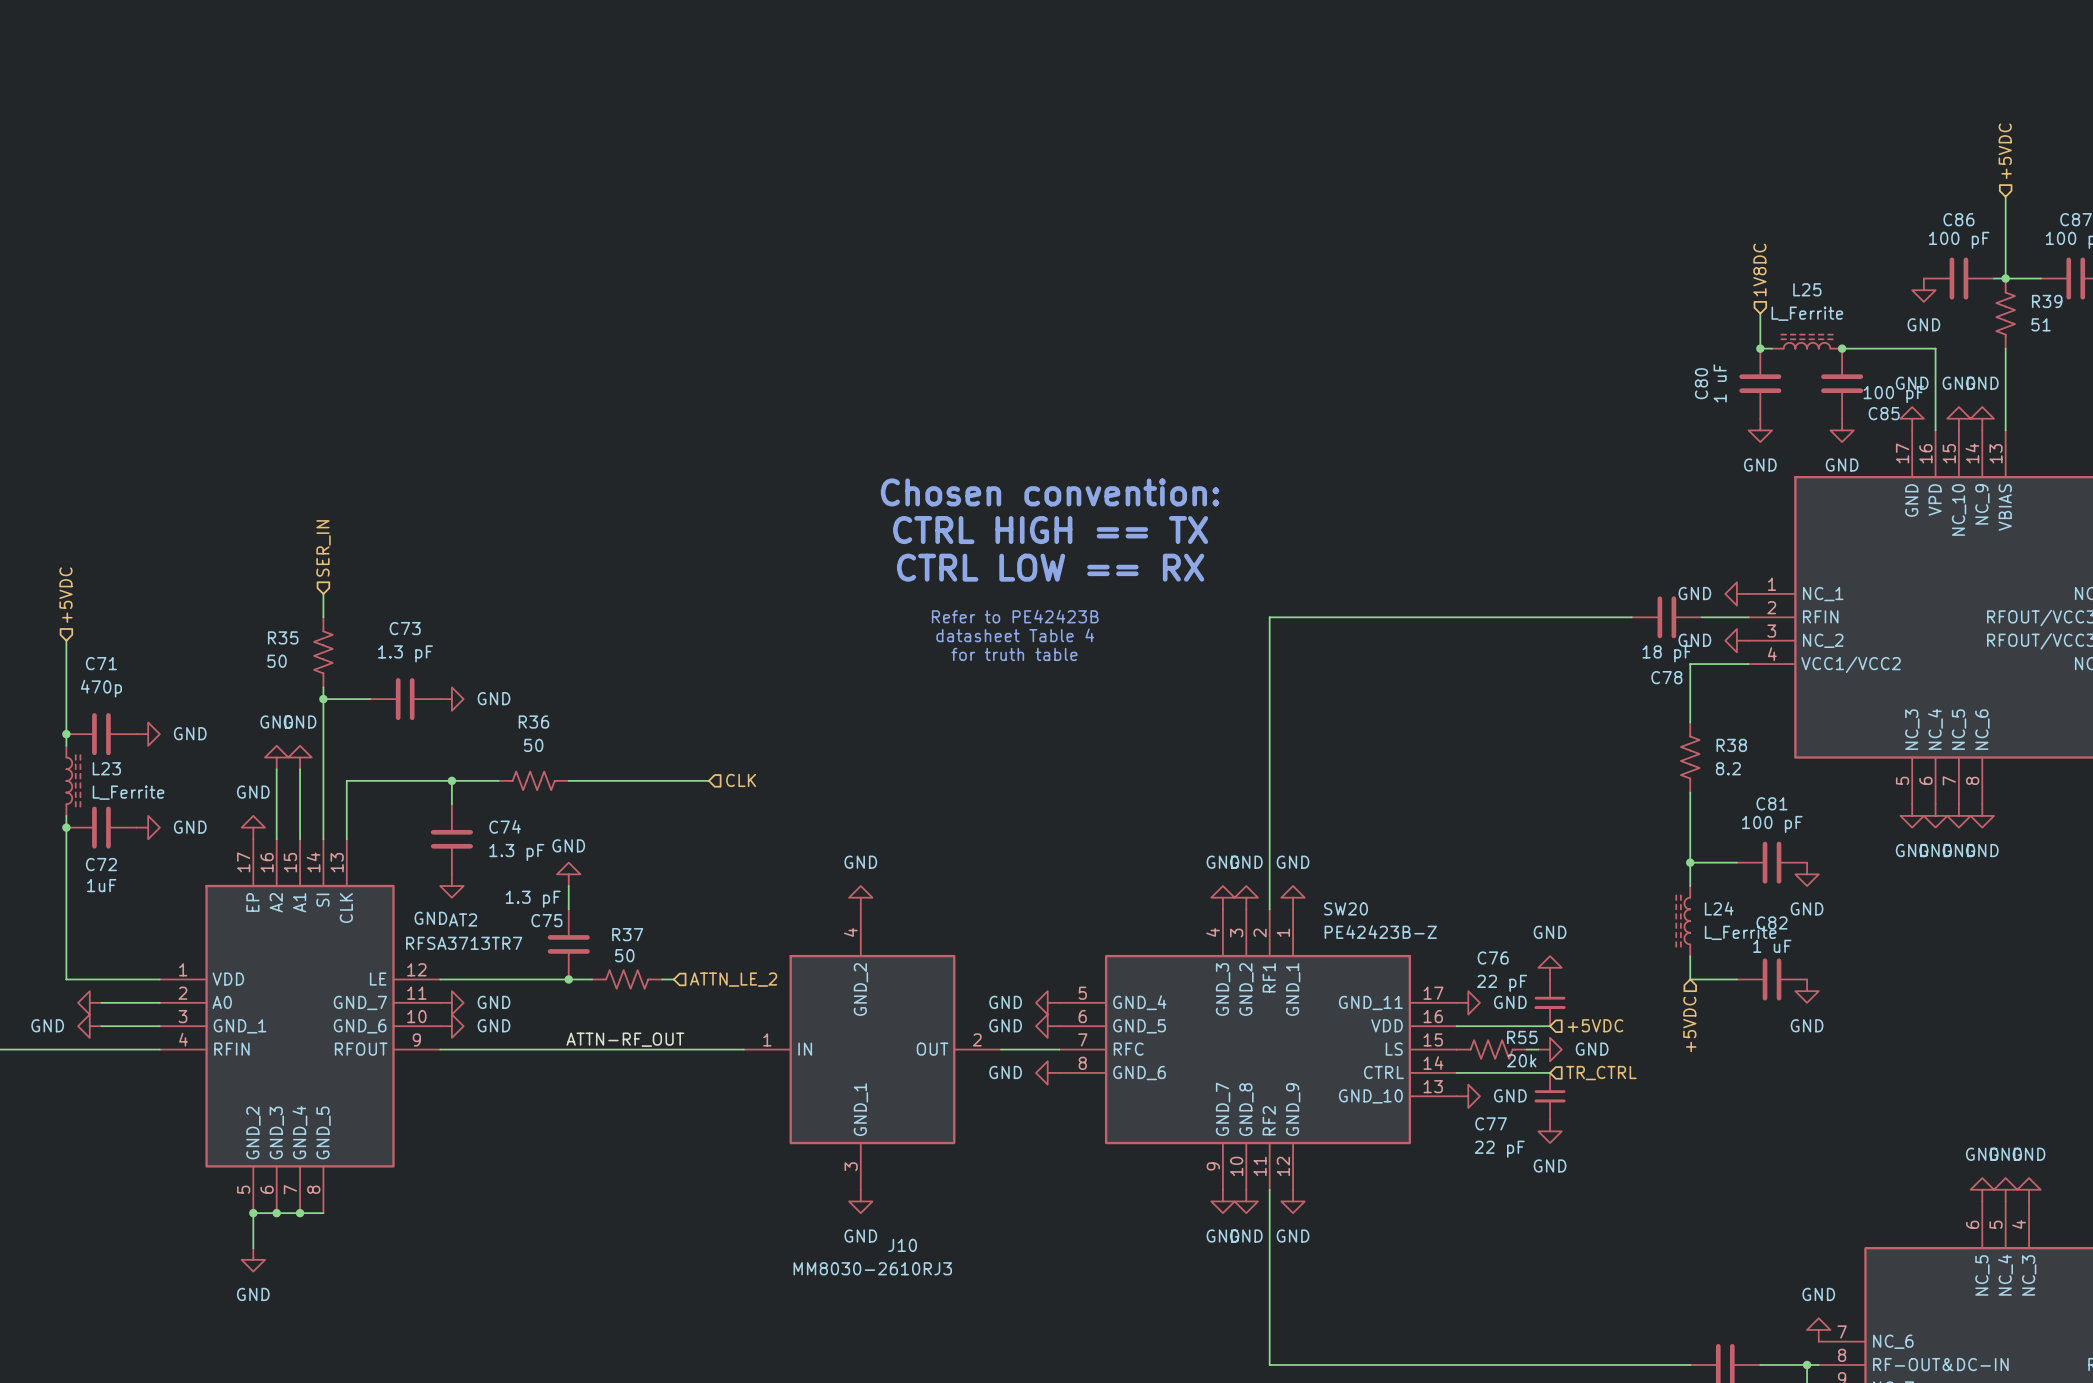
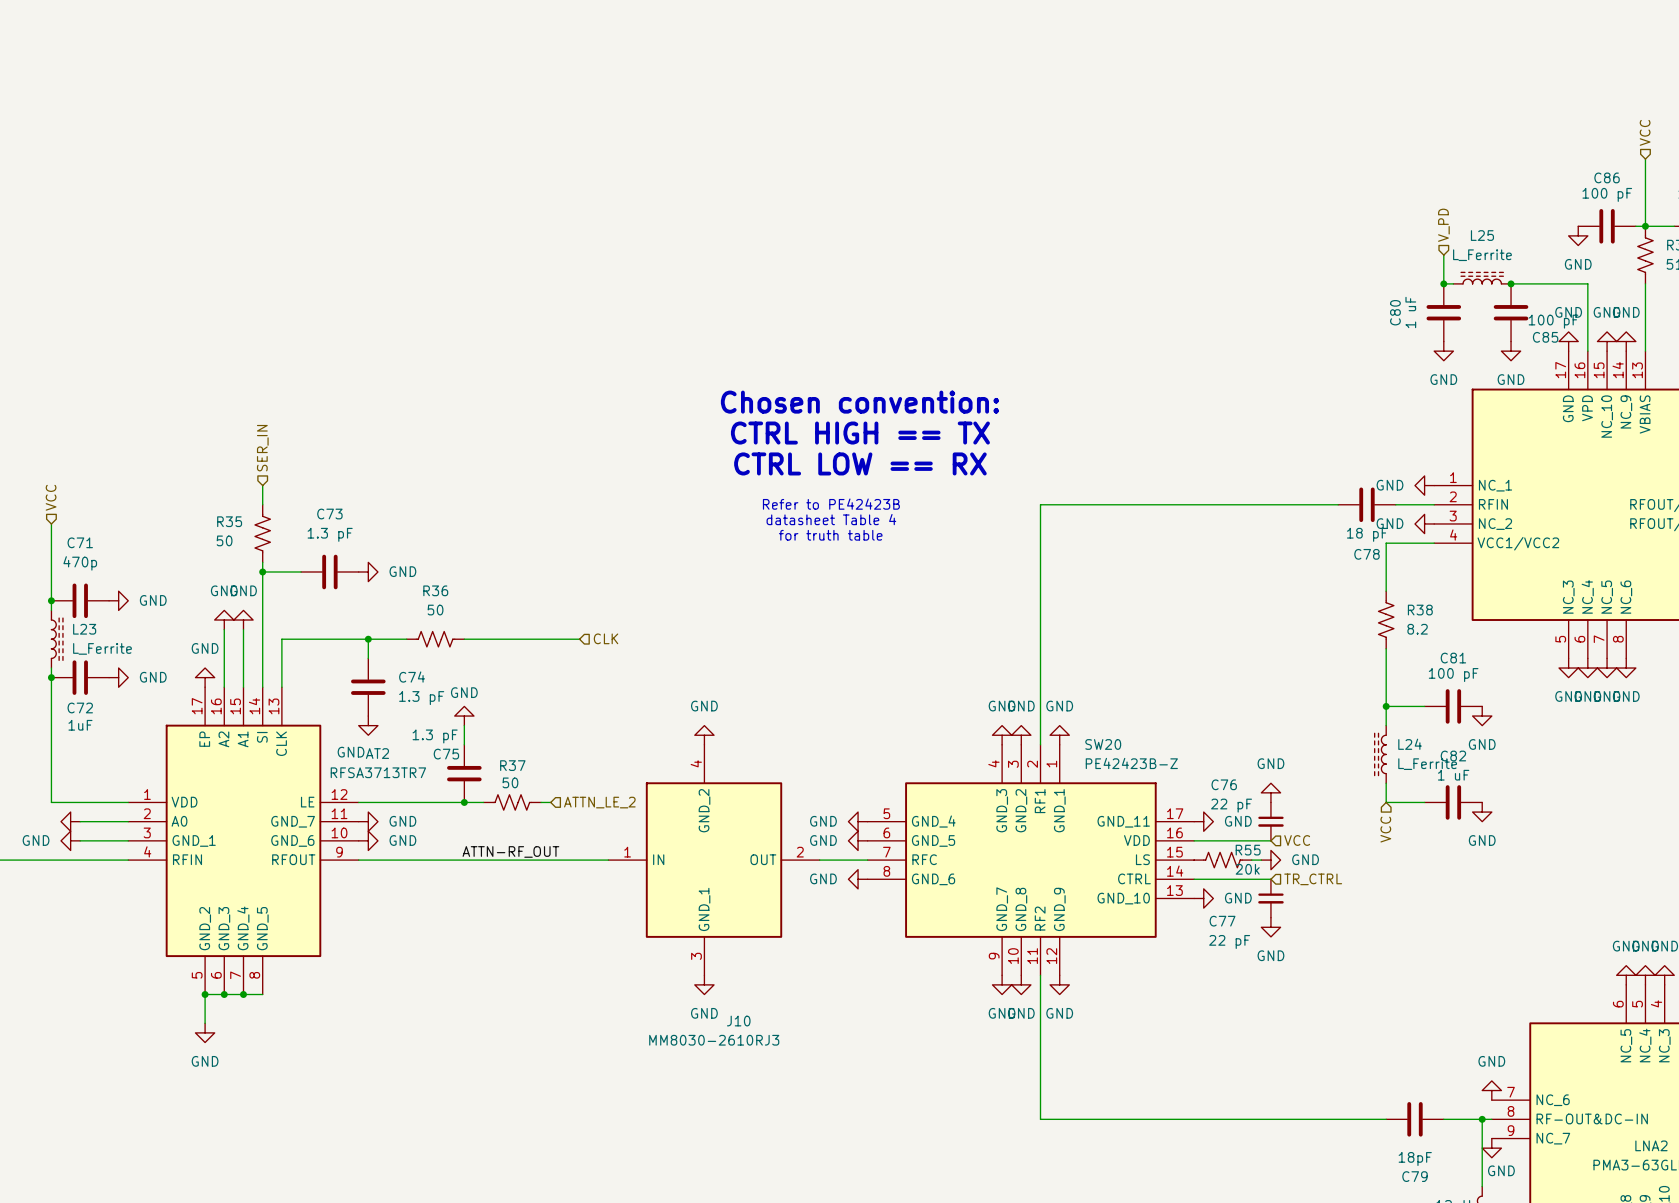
hierarchical label: +5VDC (2005, 151) -> VCC (1645, 132)
hierarchical label: 1V8DC (1759, 270) -> V_PD (1443, 225)
hierarchical label: +5VDC (65, 595) -> VCC (51, 497)
hierarchical label: +5VDC (1689, 1024) -> VCC (1385, 829)
hierarchical label: +5VDC (1595, 1025) -> VCC (1297, 840)

